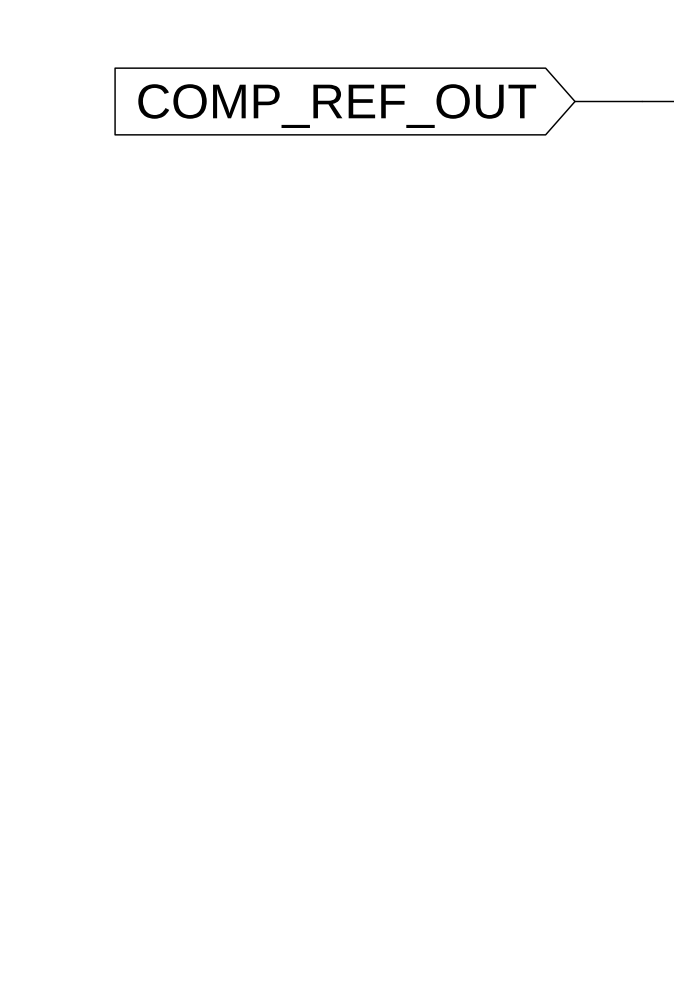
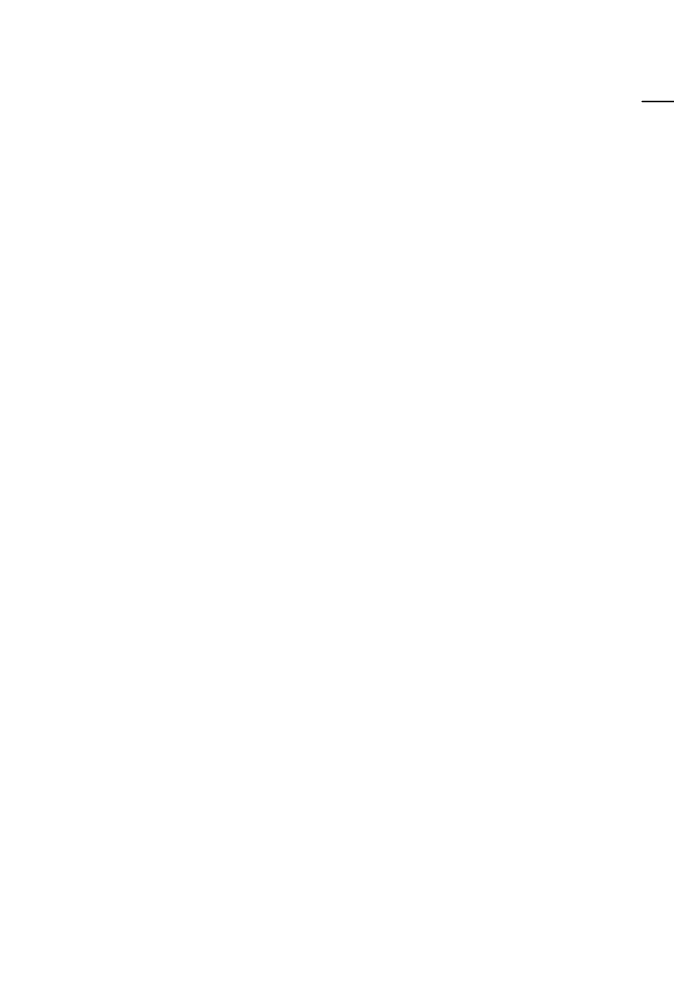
wire: (575, 101) (642, 101) -> none
global label: COMP_REF_OUT (337, 106) -> none

